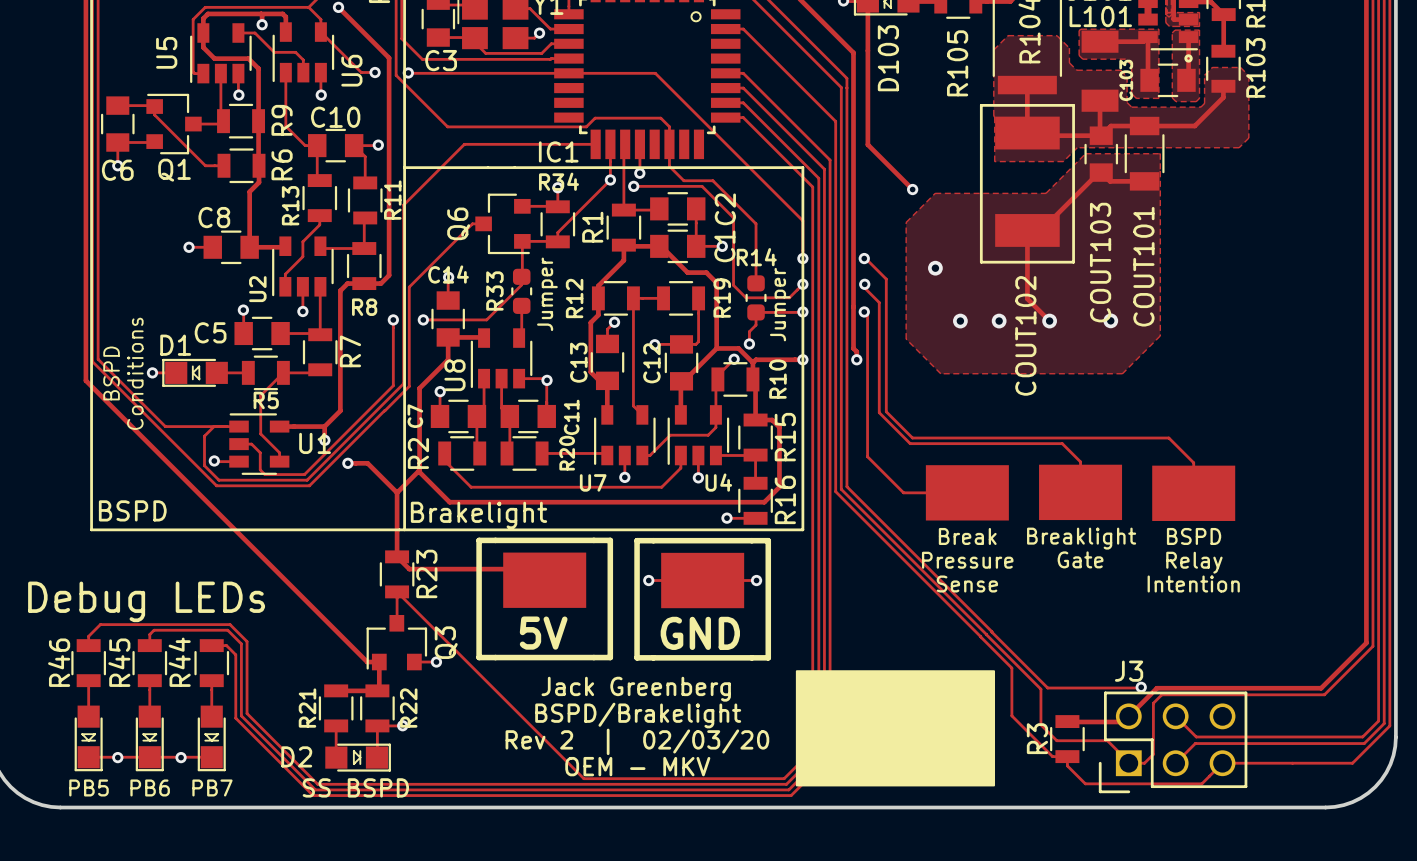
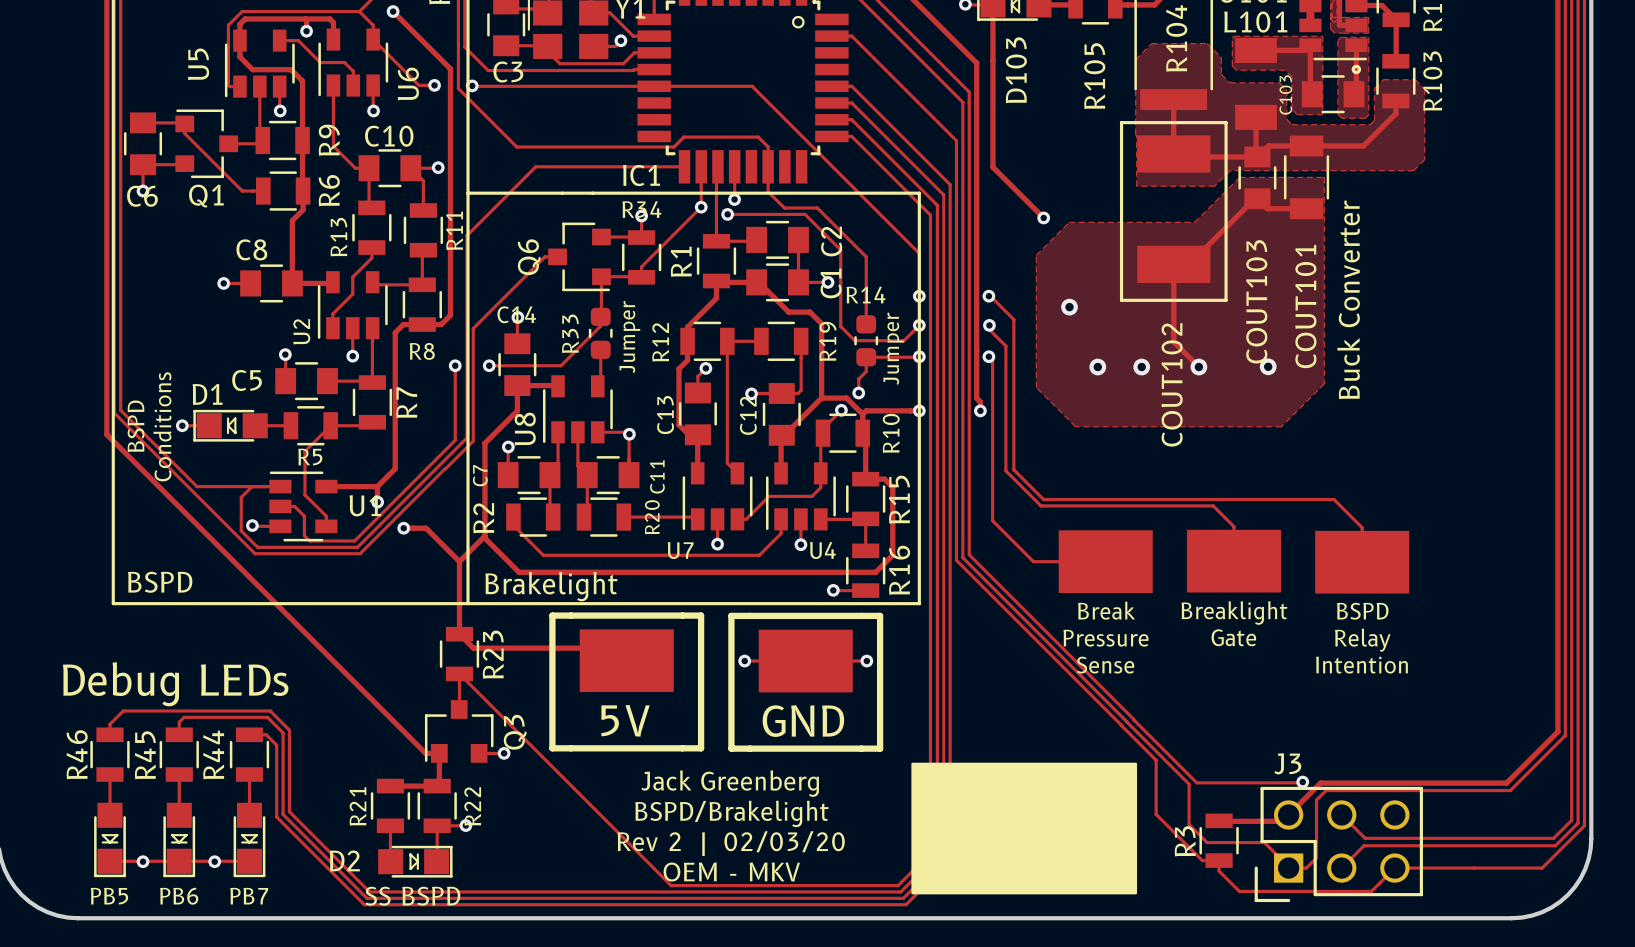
text: none -> Buck Converter (1348, 299)

